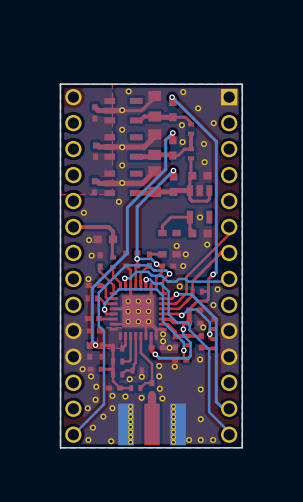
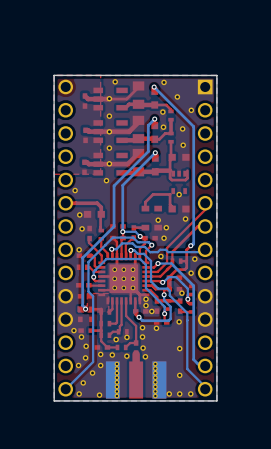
part footprint: [186, 185, 213, 224] -> [171, 170, 187, 195]

